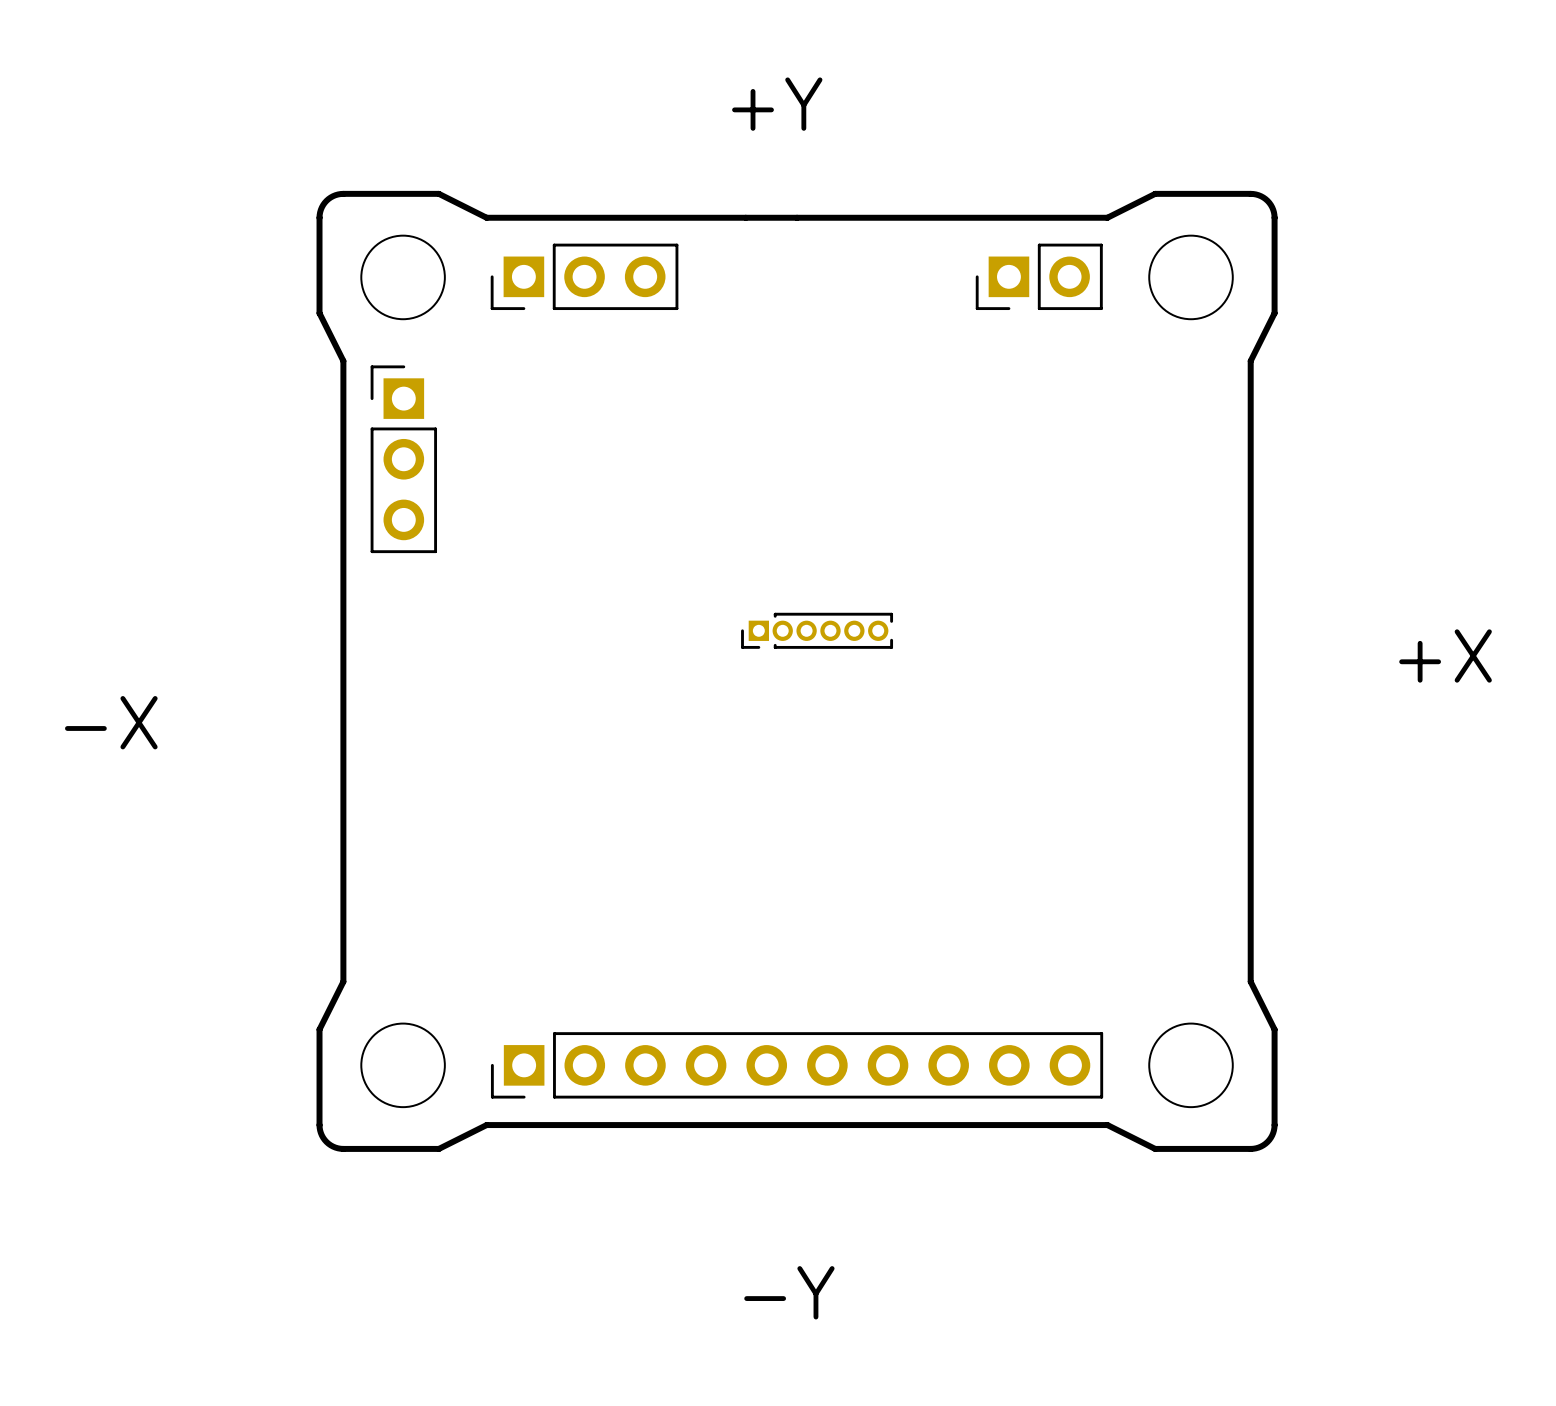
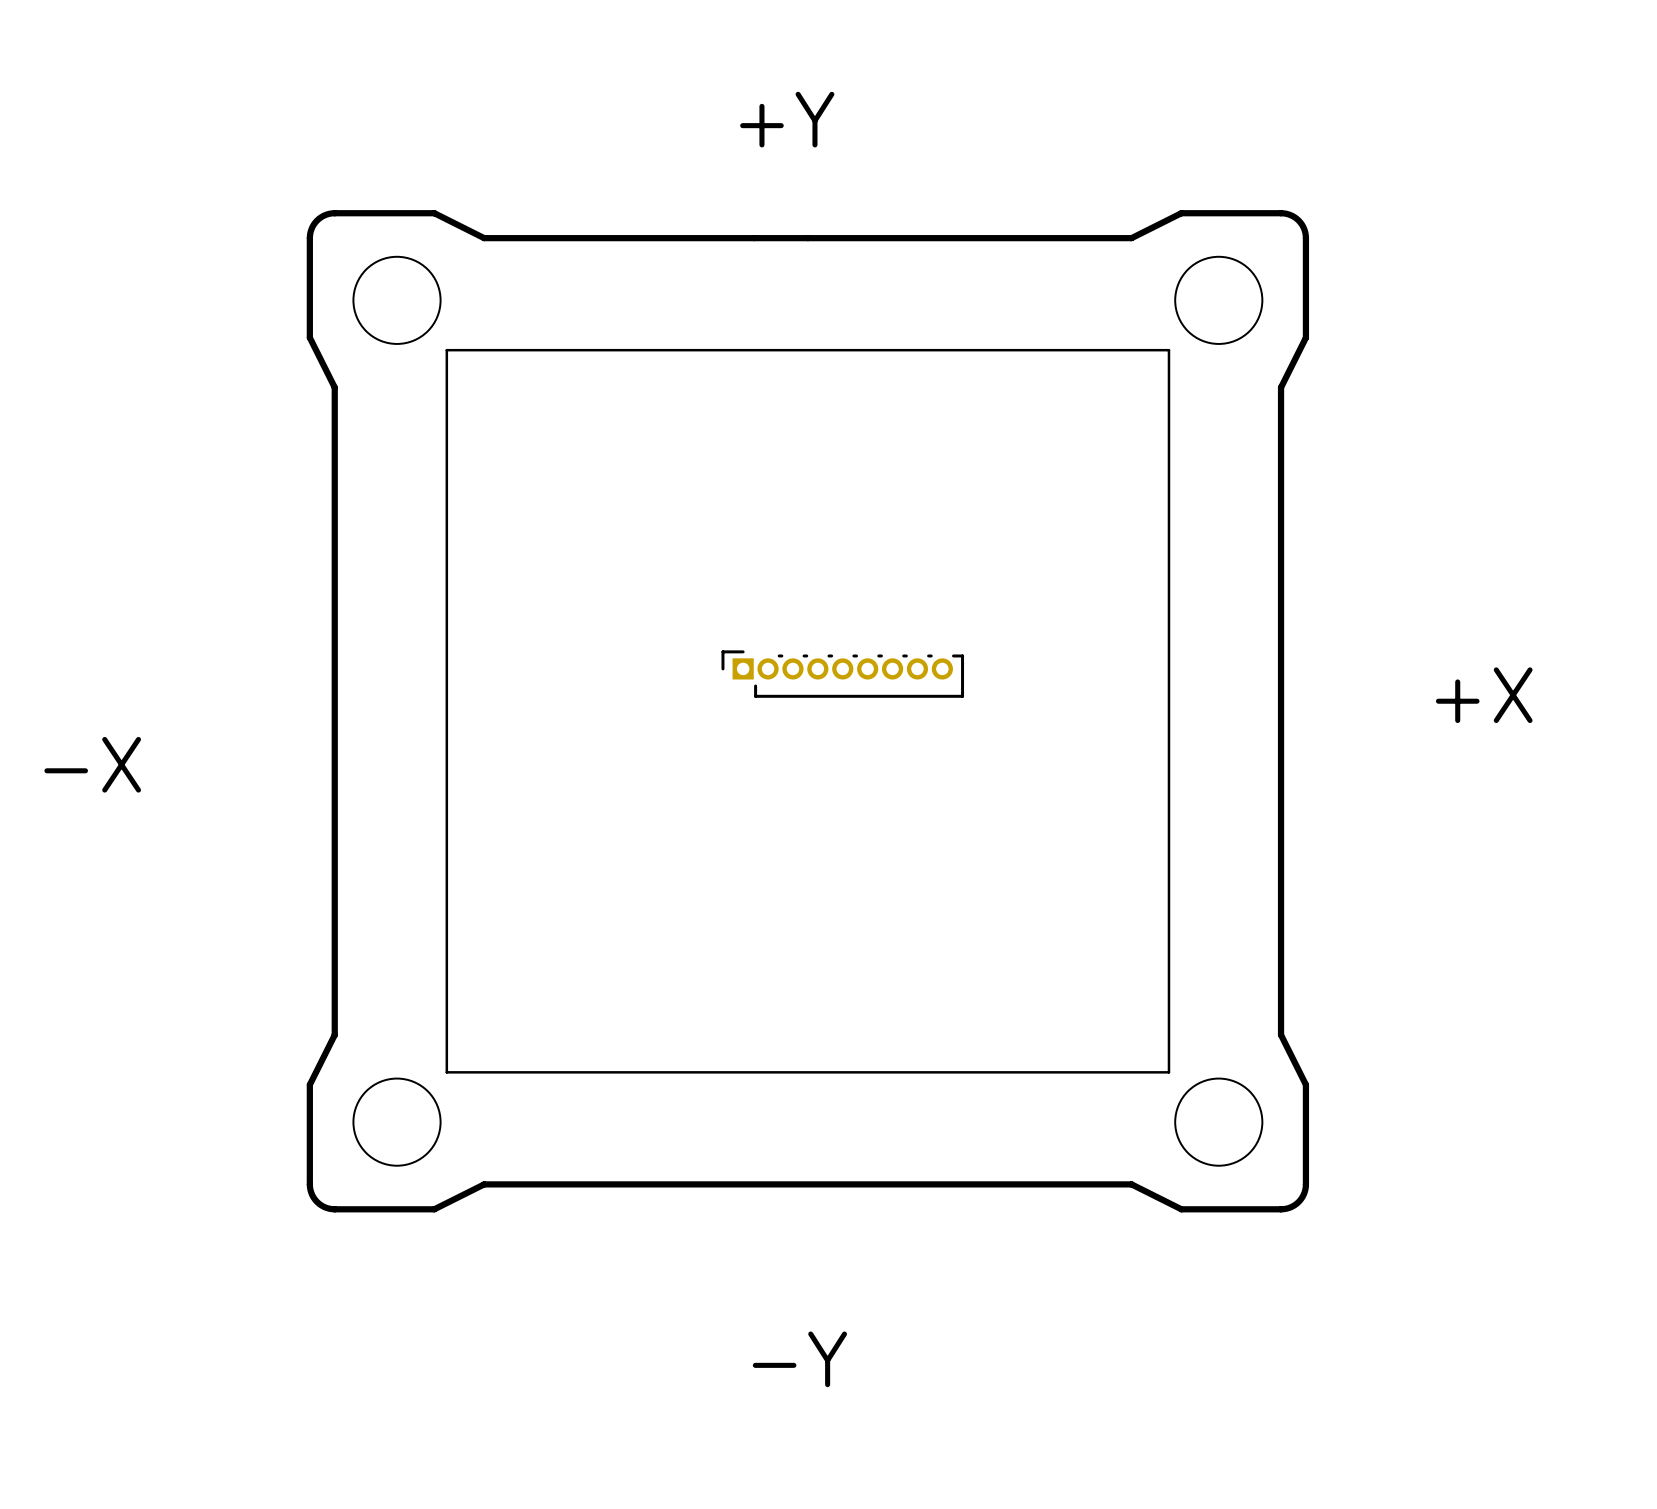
part: (584, 276) -> none
part: (1039, 276) -> none
drawing: none -> [445, 348, 1171, 1074]
part: (403, 459) -> none
part footprint: [741, 612, 894, 649] -> [721, 650, 965, 698]
part: (797, 1065) -> none

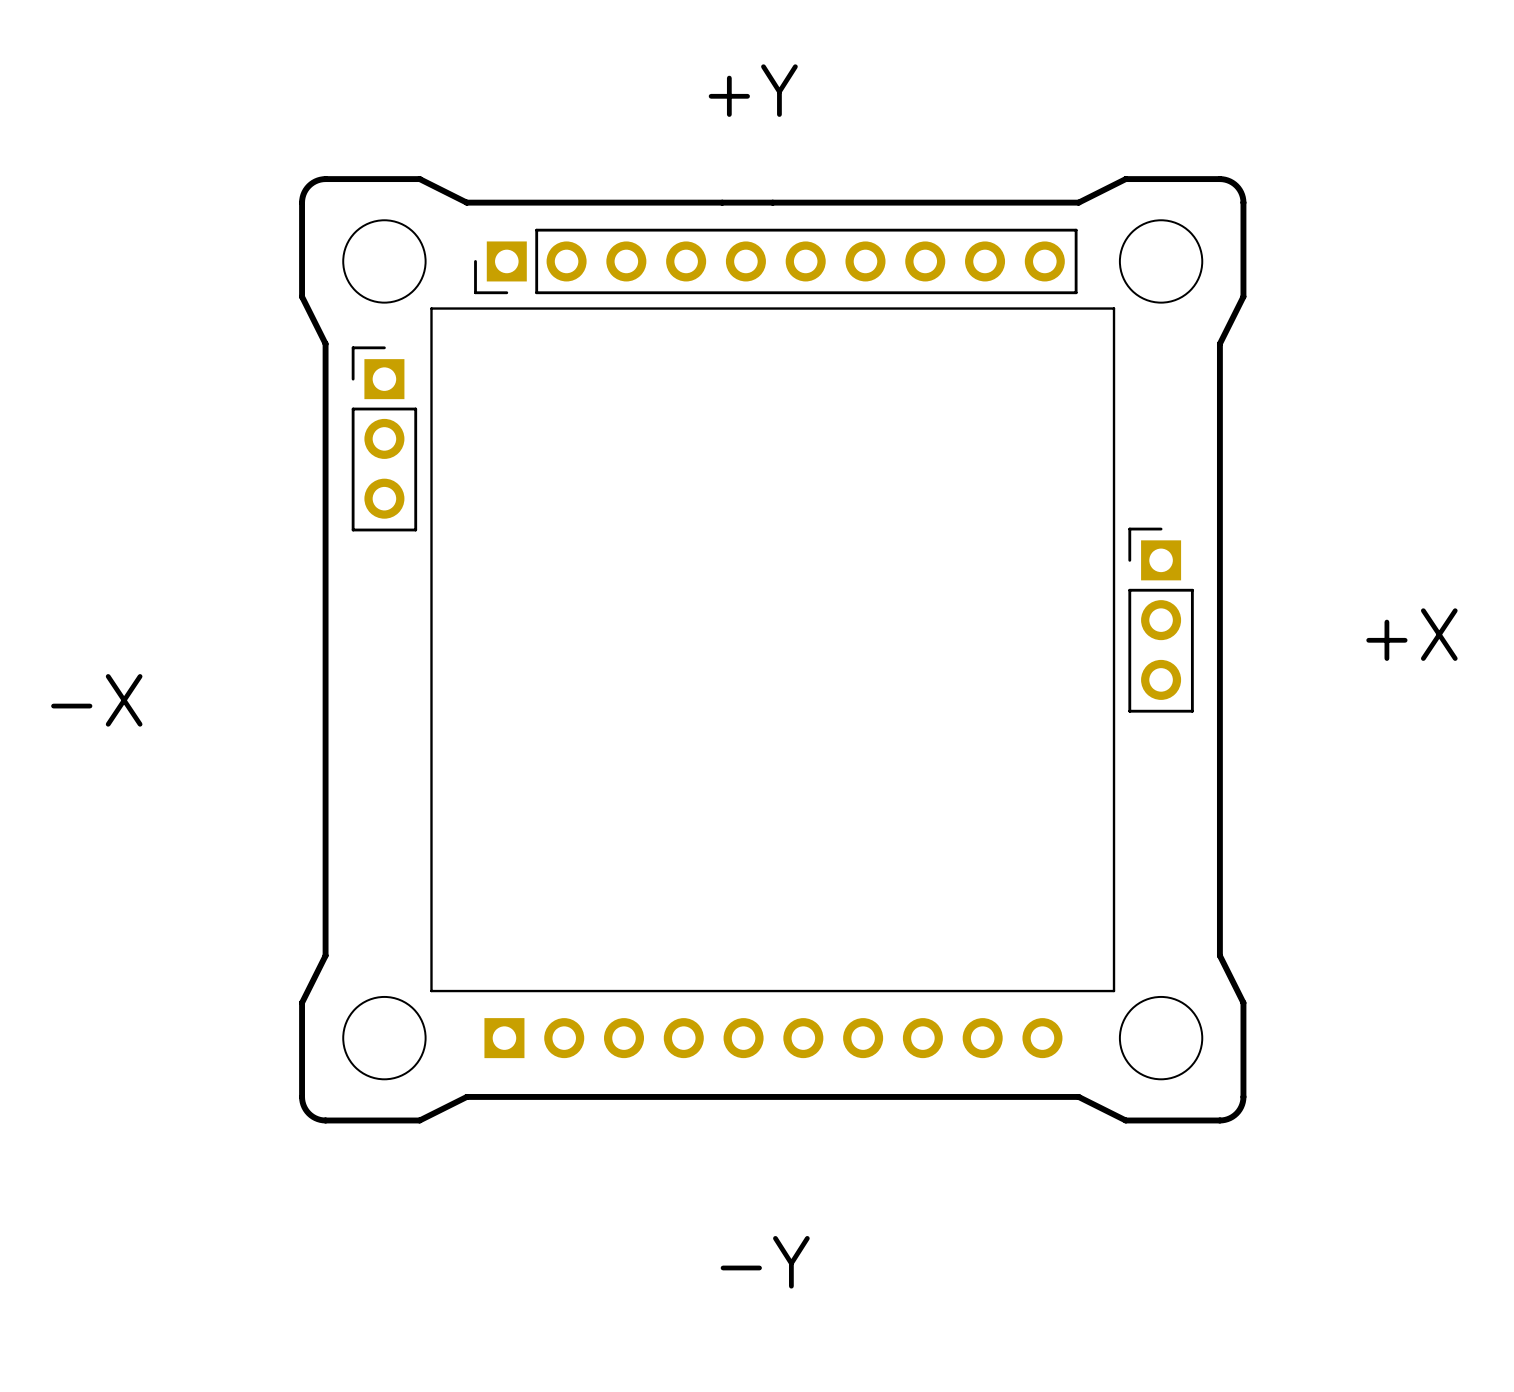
part: none -> (775, 261)
part: none -> (384, 438)
part: (842, 674) -> none
part: none -> (1161, 620)
part: none -> (773, 1038)

